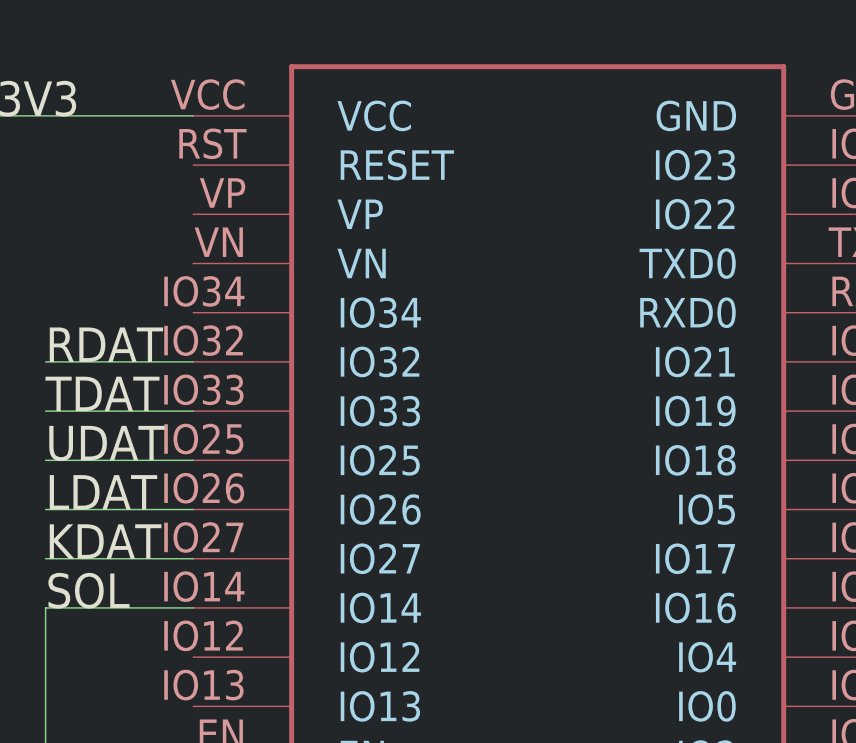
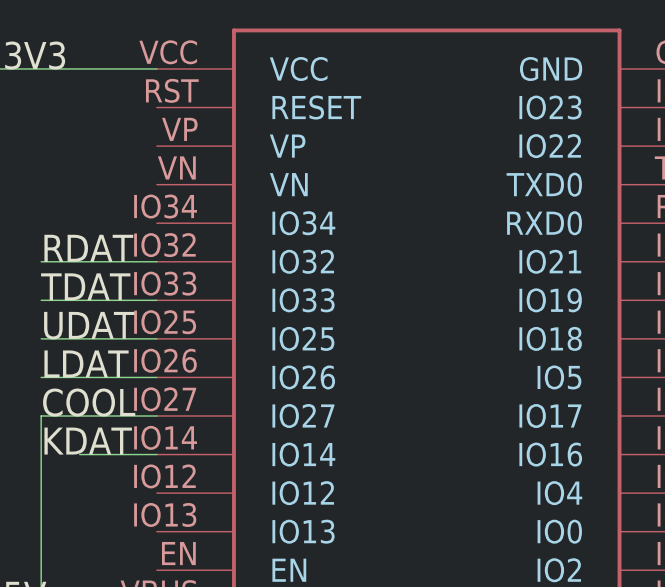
label: KDAT (105, 541) -> COOL (89, 402)
label: SOL (88, 590) -> KDAT (88, 441)
wire: (45, 607) (94, 607) -> (41, 454) (41, 416)

